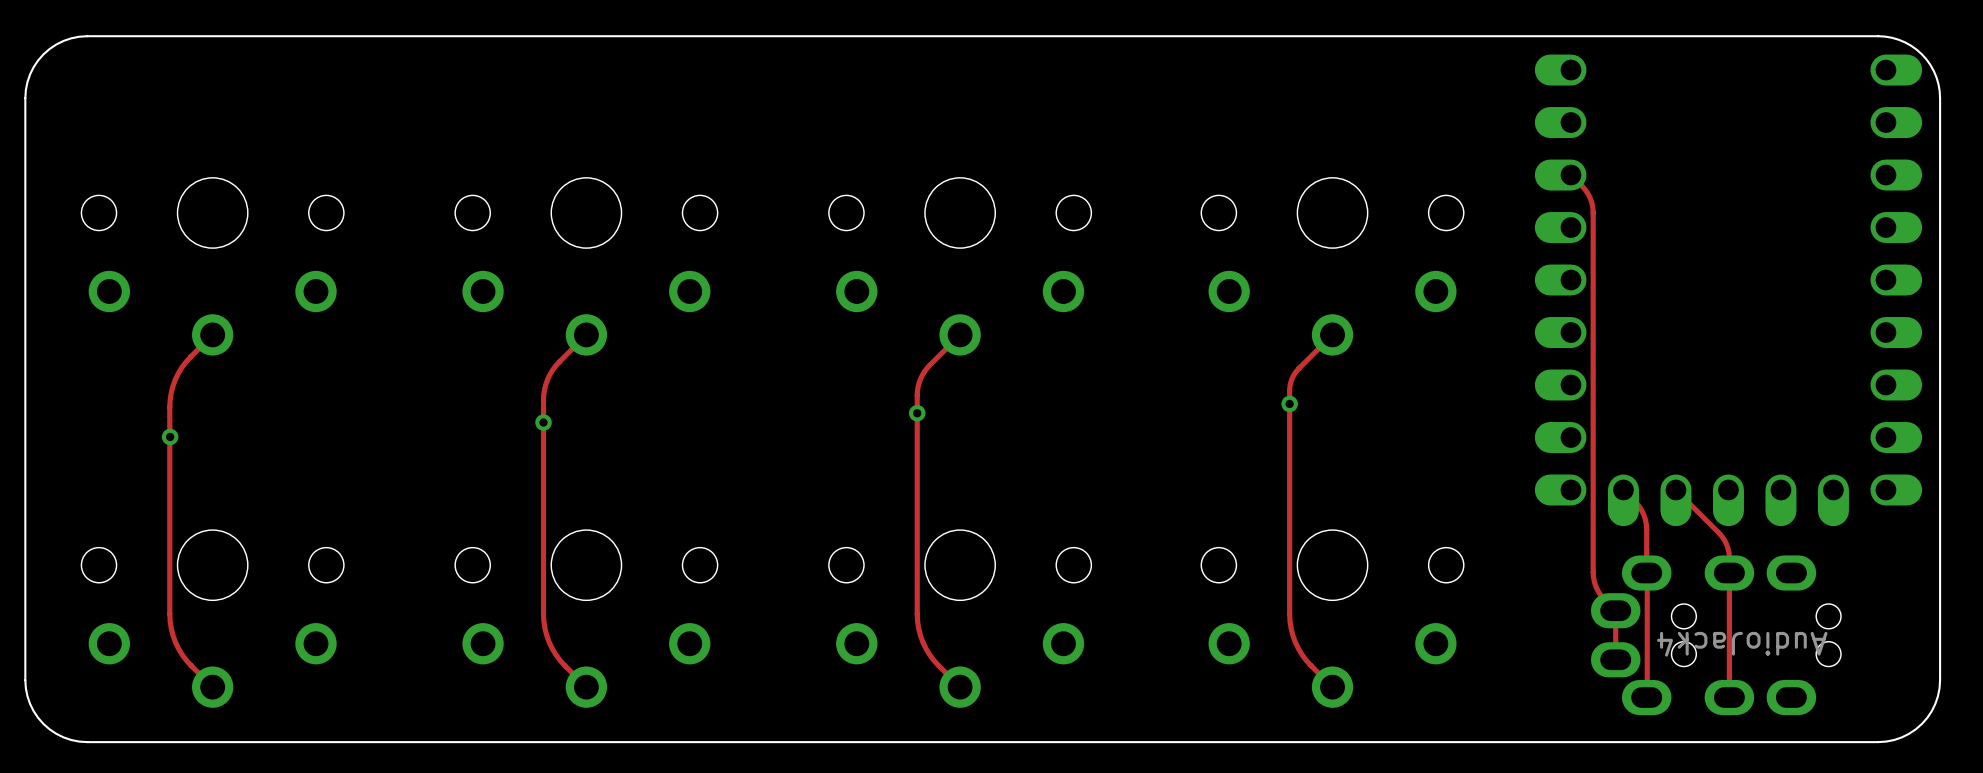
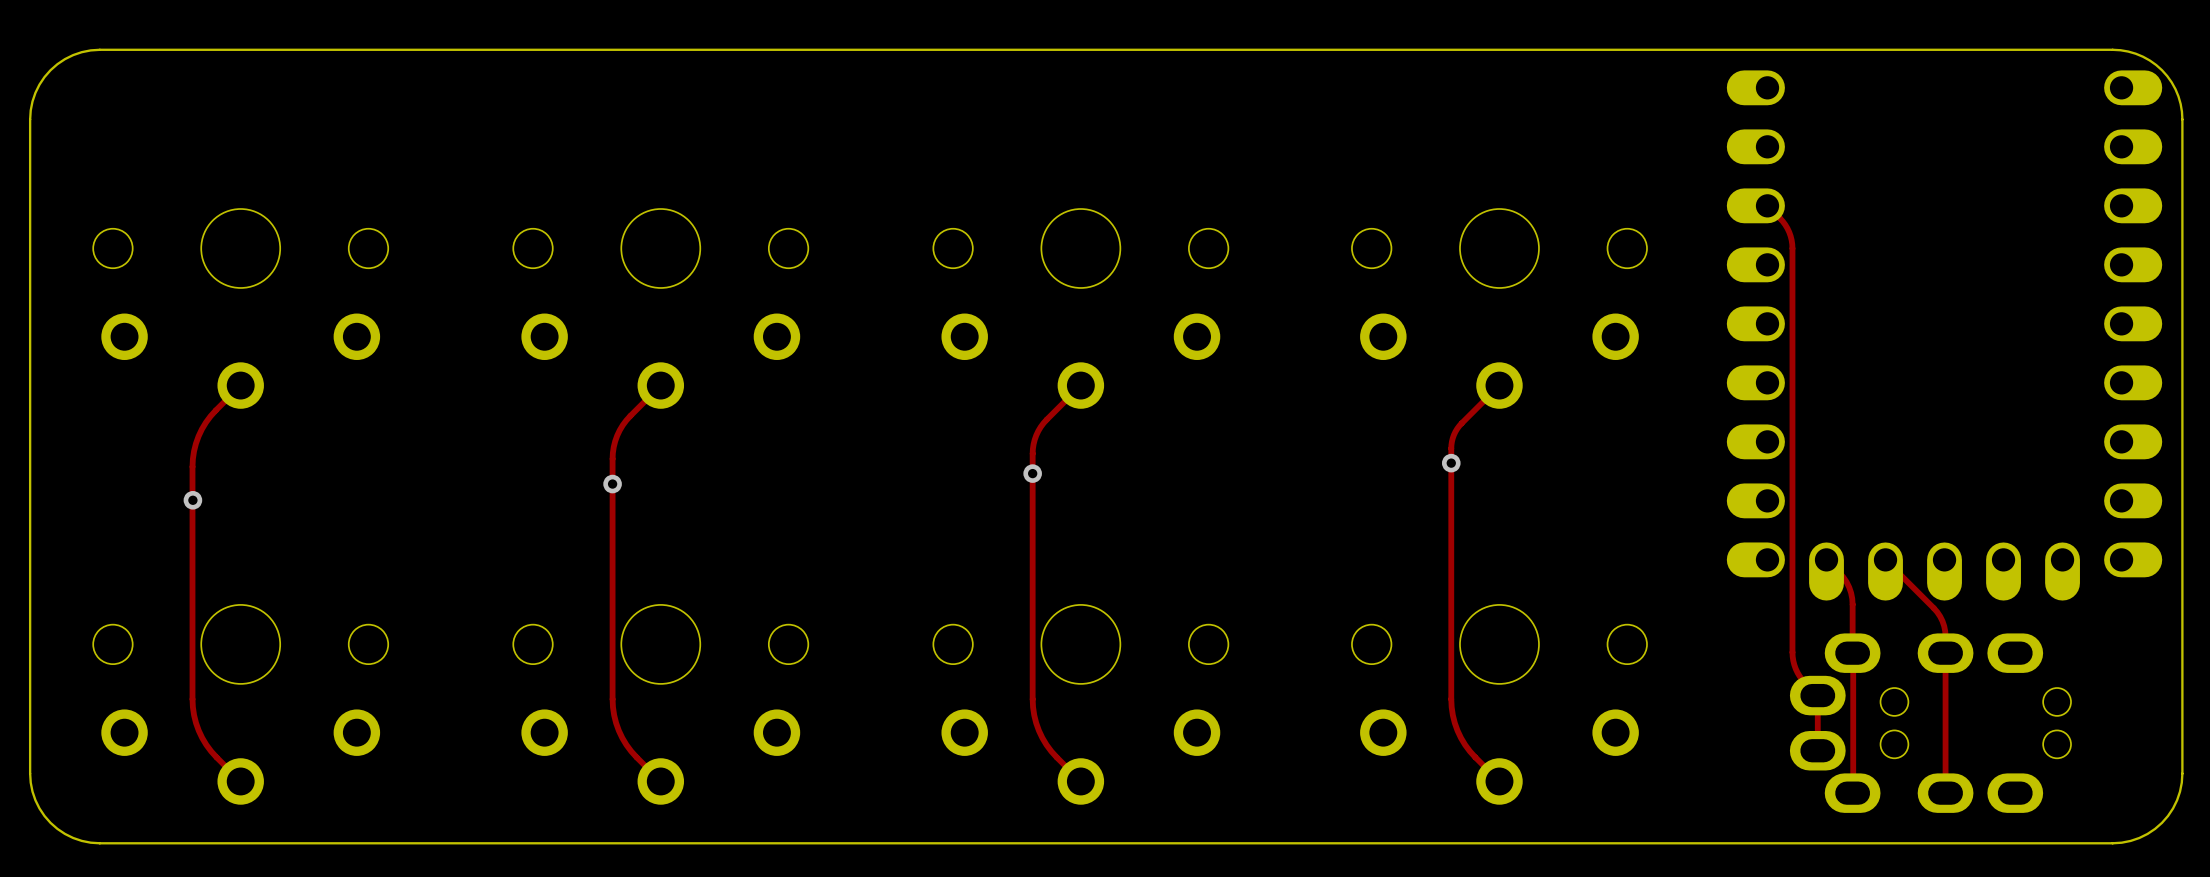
part value: AudioJack4 (1742, 644) -> none

